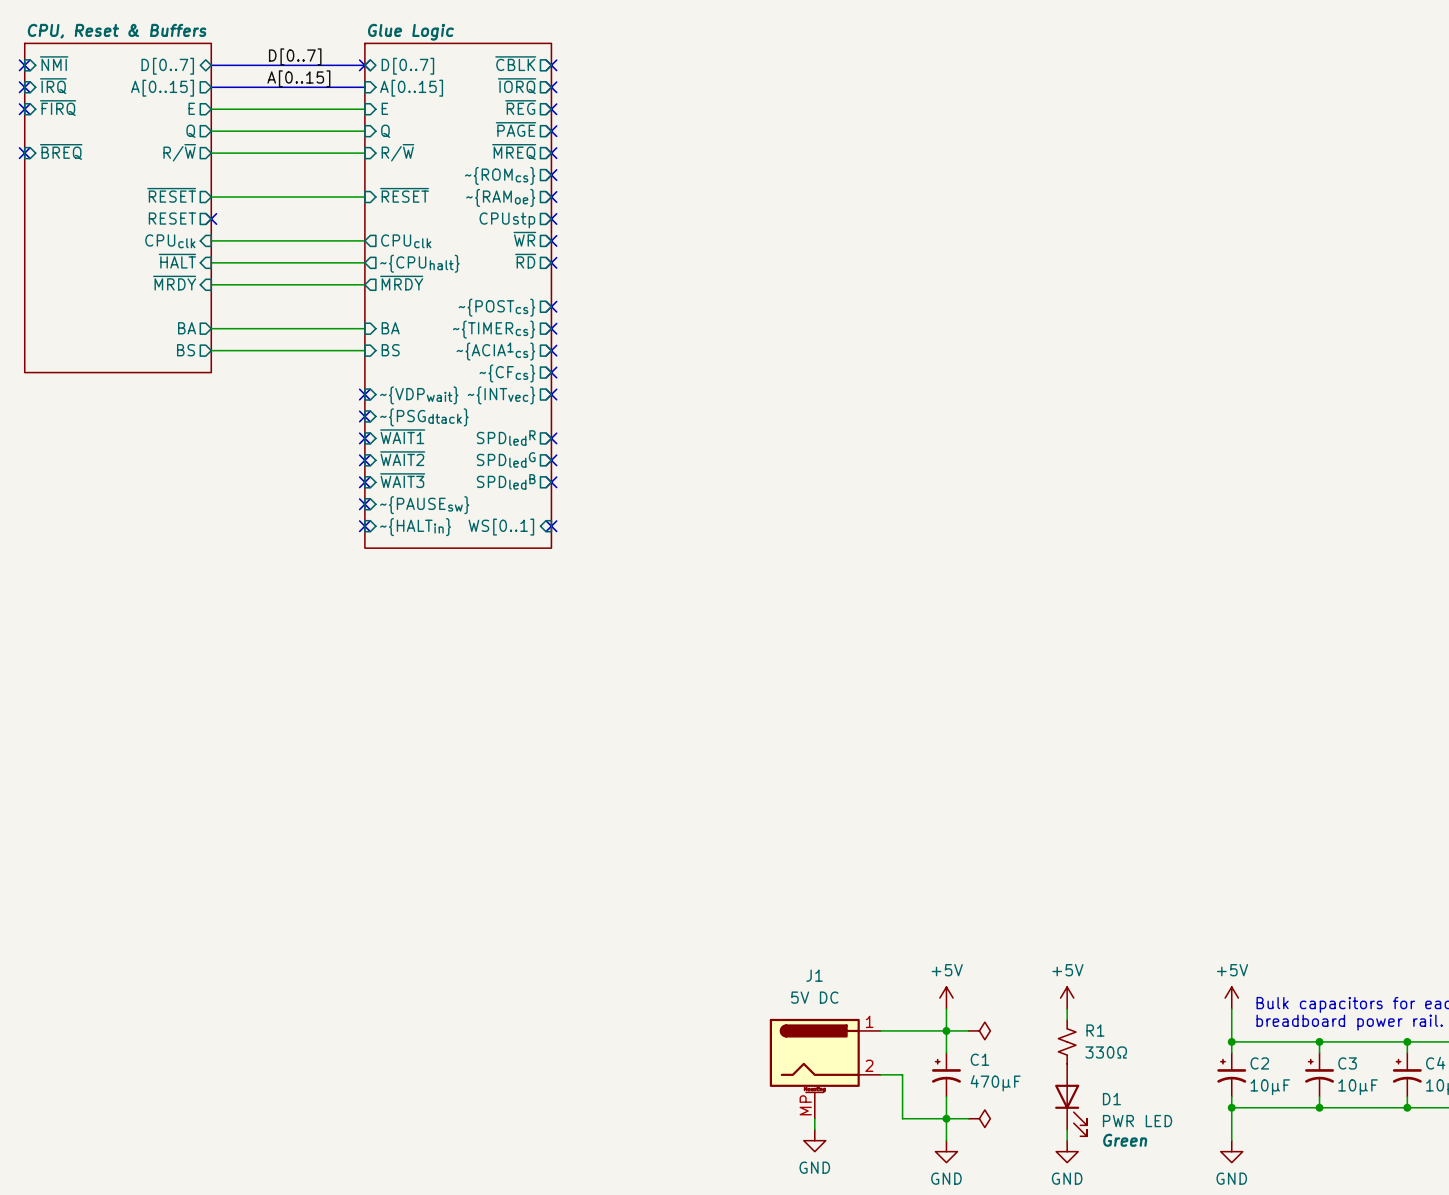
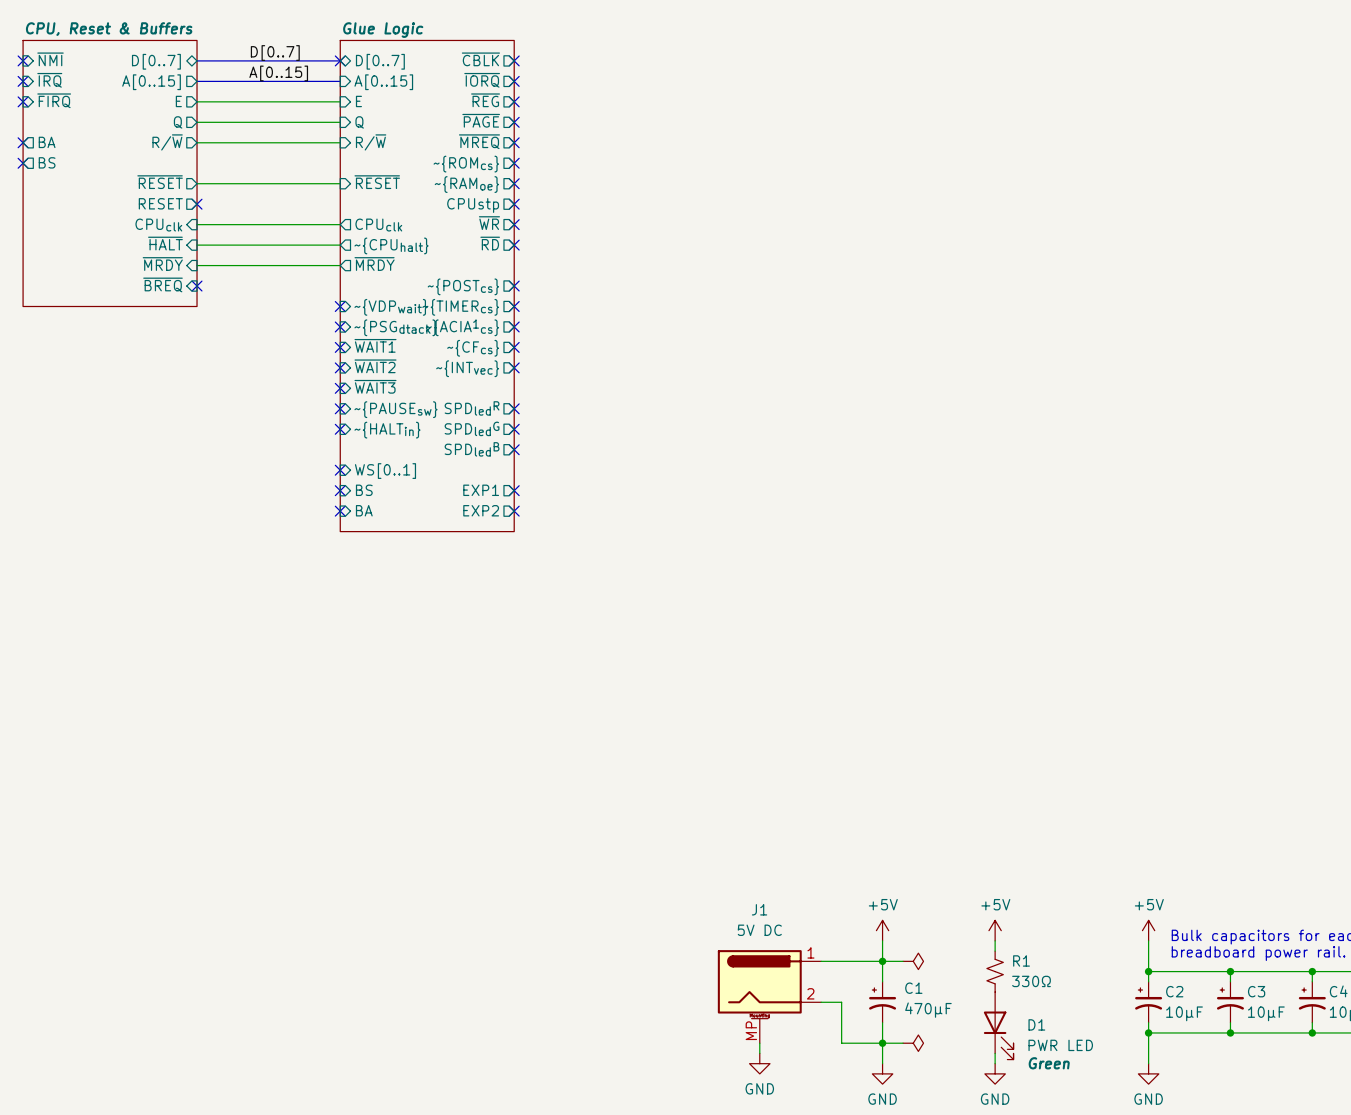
sheet pin shape: input (61, 151) -> output (47, 142)
sheet pin: ~{BREQ} (61, 151) -> BA (47, 142)
sheet pin: none -> BS (47, 162)
no-connect mark: none -> (23, 163)
sheet CPU, Reset & Buffers: none -> (110, 173)
sheet CPU, Reset & Buffers: (118, 207) -> none
sheet Glue Logic: (458, 295) -> none
sheet pin: none -> ~{BREQ} (162, 284)
no-connect mark: none -> (197, 286)
sheet Glue Logic: none -> (427, 286)
sheet pin: BA (187, 328) -> none
wire: (211, 328) (364, 328) -> none
no-connect mark: none -> (340, 306)
sheet pin: BA (390, 328) -> ~{VDPwait} (390, 307)
sheet pin: BS (186, 350) -> none
wire: (211, 350) (364, 350) -> none
no-connect mark: none -> (340, 326)
sheet pin: BS (390, 350) -> ~{PSGdtack} (395, 327)
sheet pin: none -> ~{WAIT1} (375, 345)
no-connect mark: none -> (340, 347)
sheet pin: ~{VDPwait} (419, 395) -> ~{WAIT2} (375, 366)
sheet pin: ~{PSGdtack} (424, 417) -> ~{WAIT3} (375, 386)
sheet pin: ~{WAIT1} (402, 436) -> ~{PAUSEsw} (396, 409)
sheet pin: ~{WAIT2} (402, 458) -> ~{HALTin} (387, 430)
sheet pin: ~{WAIT3} (402, 480) -> none
no-connect mark: (364, 482) -> none
sheet pin: ~{PAUSEsw} (424, 505) -> WS[0..1] (385, 471)
sheet pin: ~{HALTin} (415, 527) -> BS (364, 490)
sheet pin shape: input (501, 527) -> output (481, 490)
sheet pin: WS[0..1] (501, 527) -> EXP1 (481, 490)
sheet pin: none -> BA (364, 510)
sheet pin: none -> EXP2 (481, 510)
no-connect mark: none -> (340, 511)
no-connect mark: none -> (514, 511)

